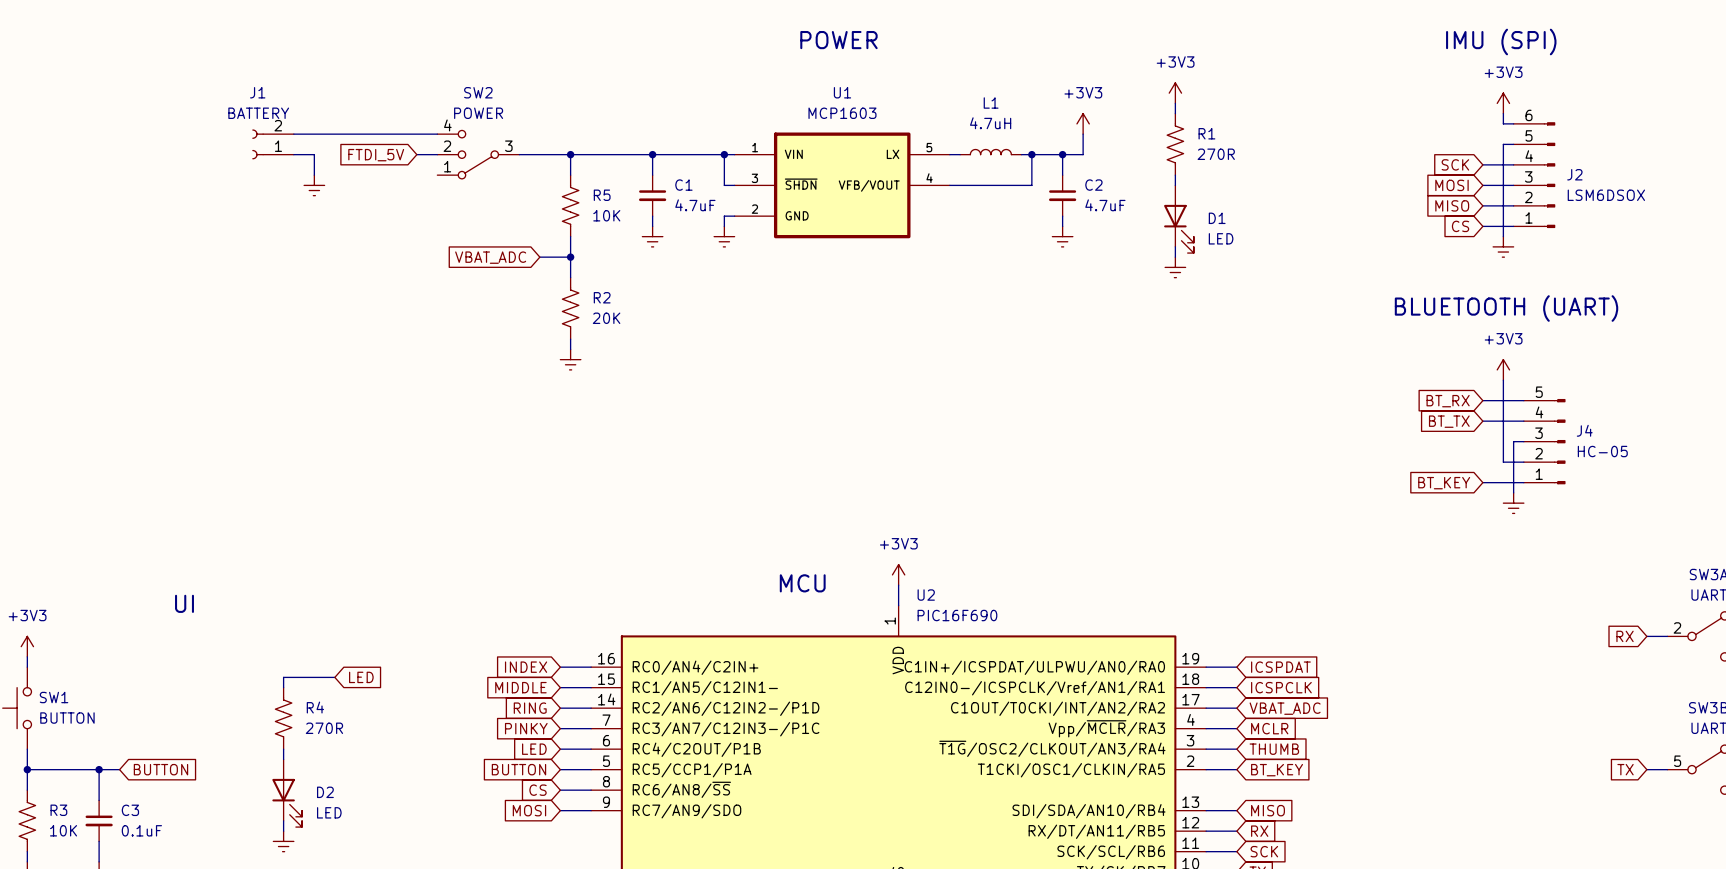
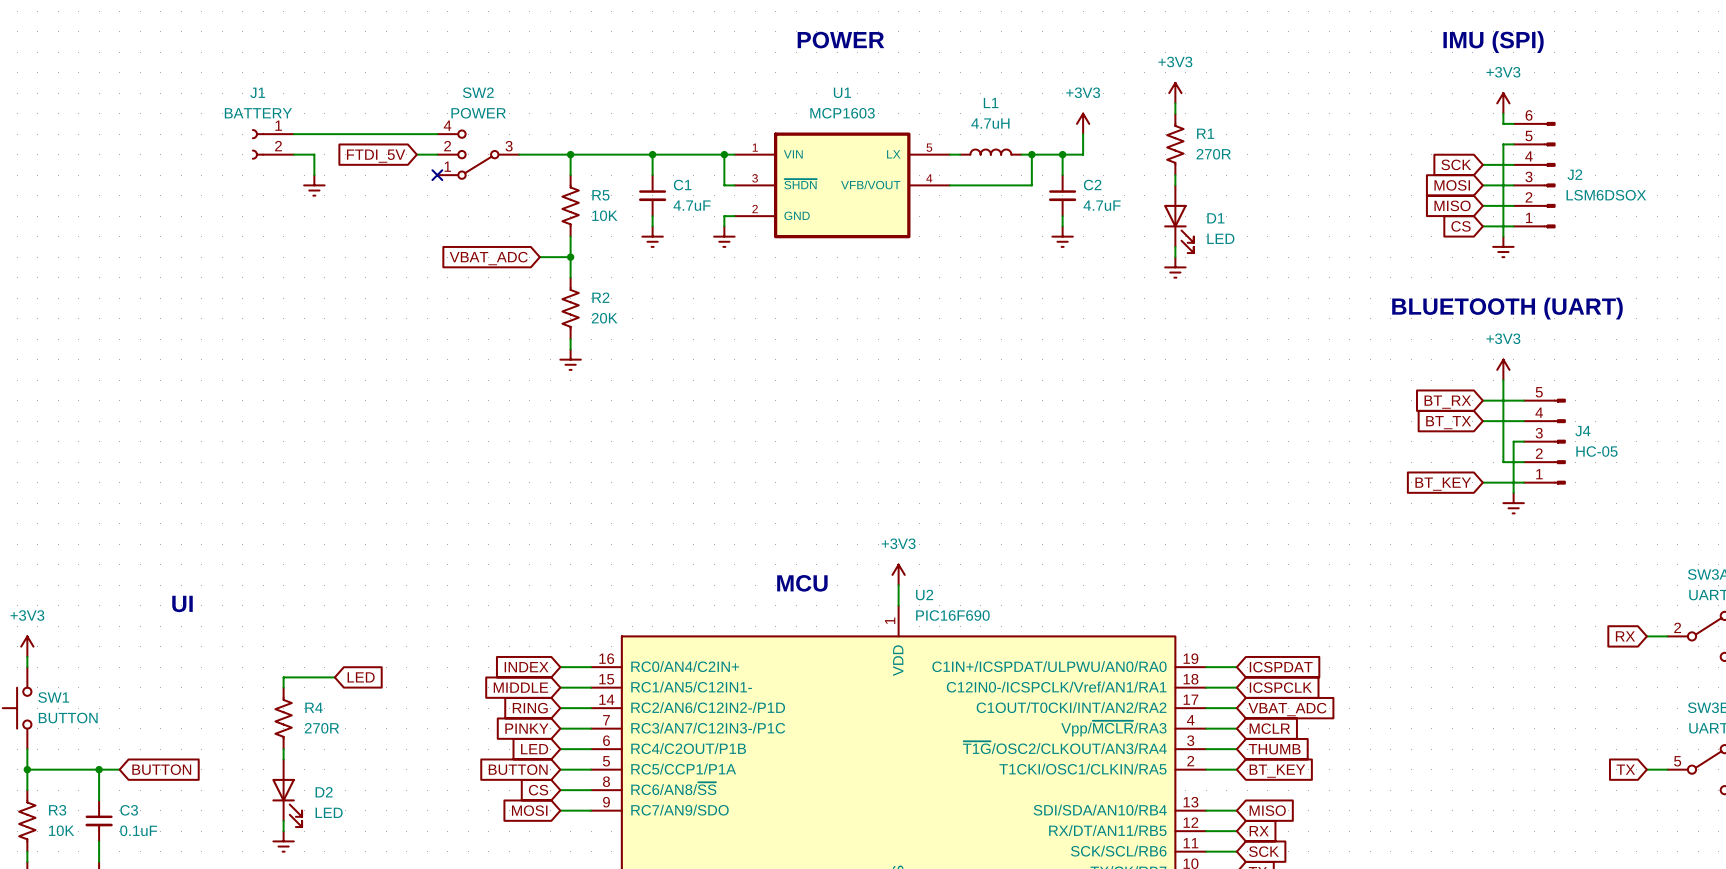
J1 flip: as is (257, 144) -> up-down (257, 144)
no-connect mark: none -> (437, 175)

